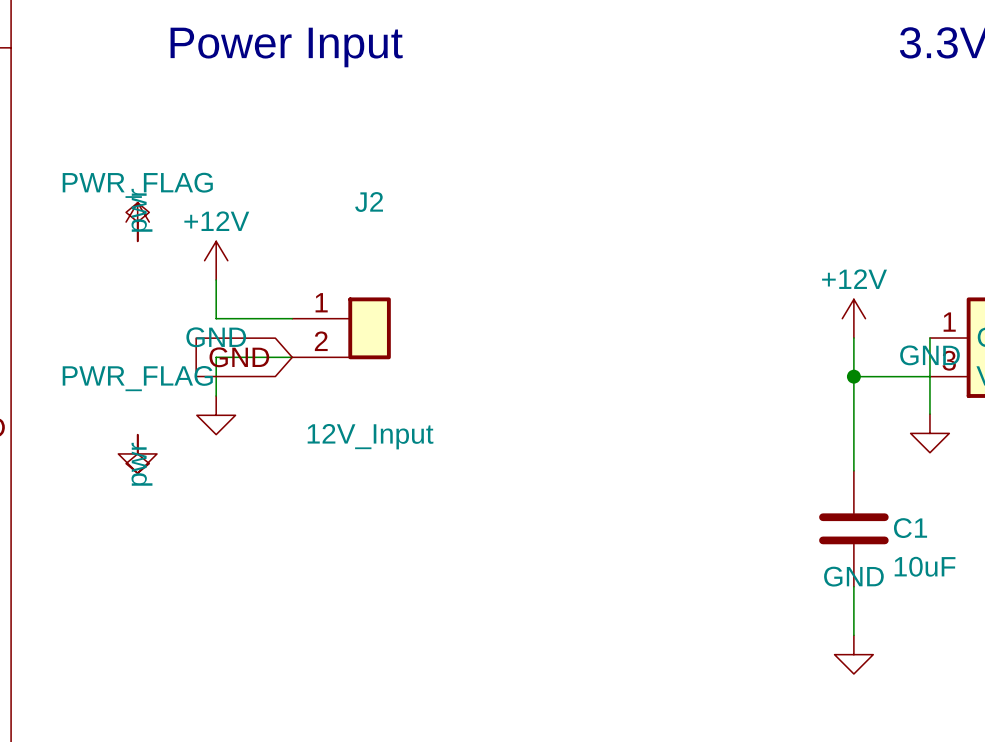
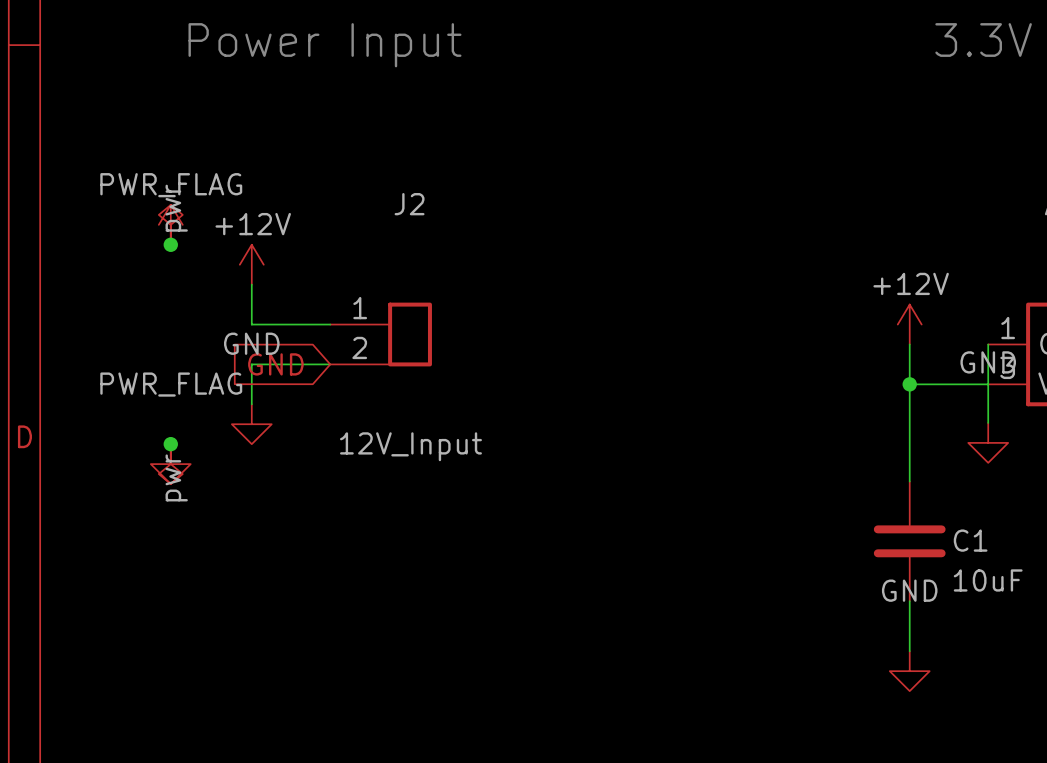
junction: none -> (170, 244)
junction: none -> (170, 444)

